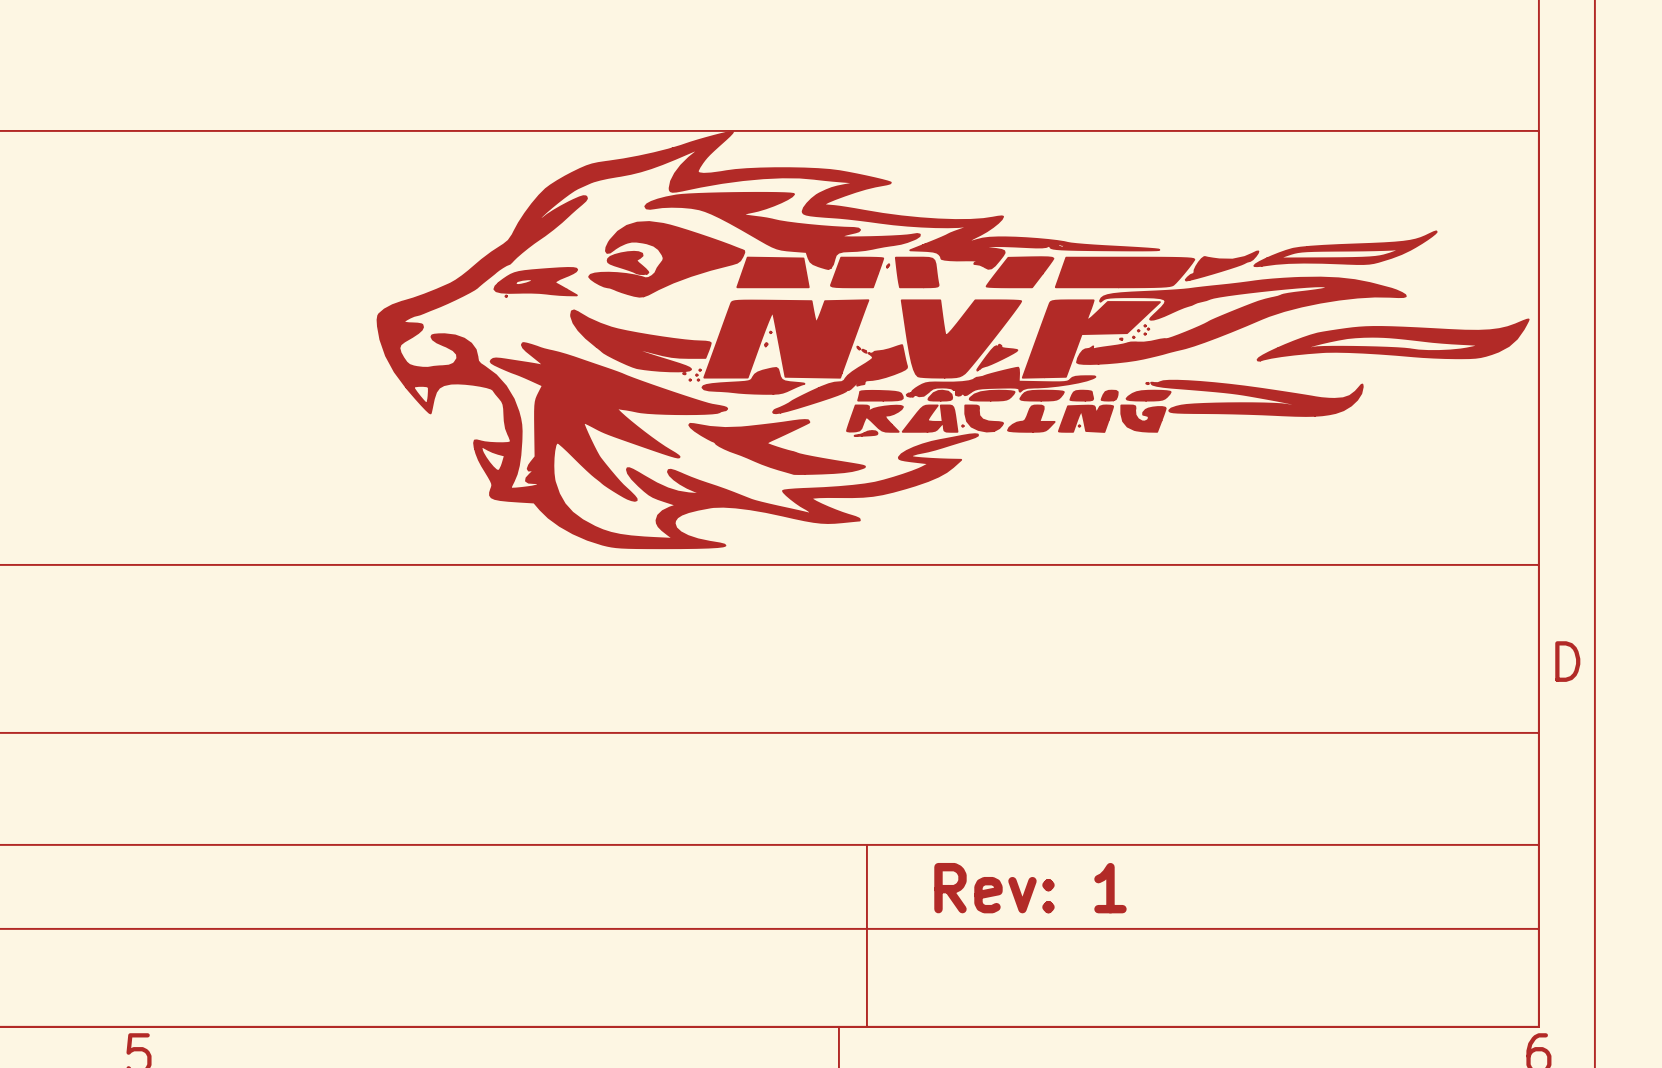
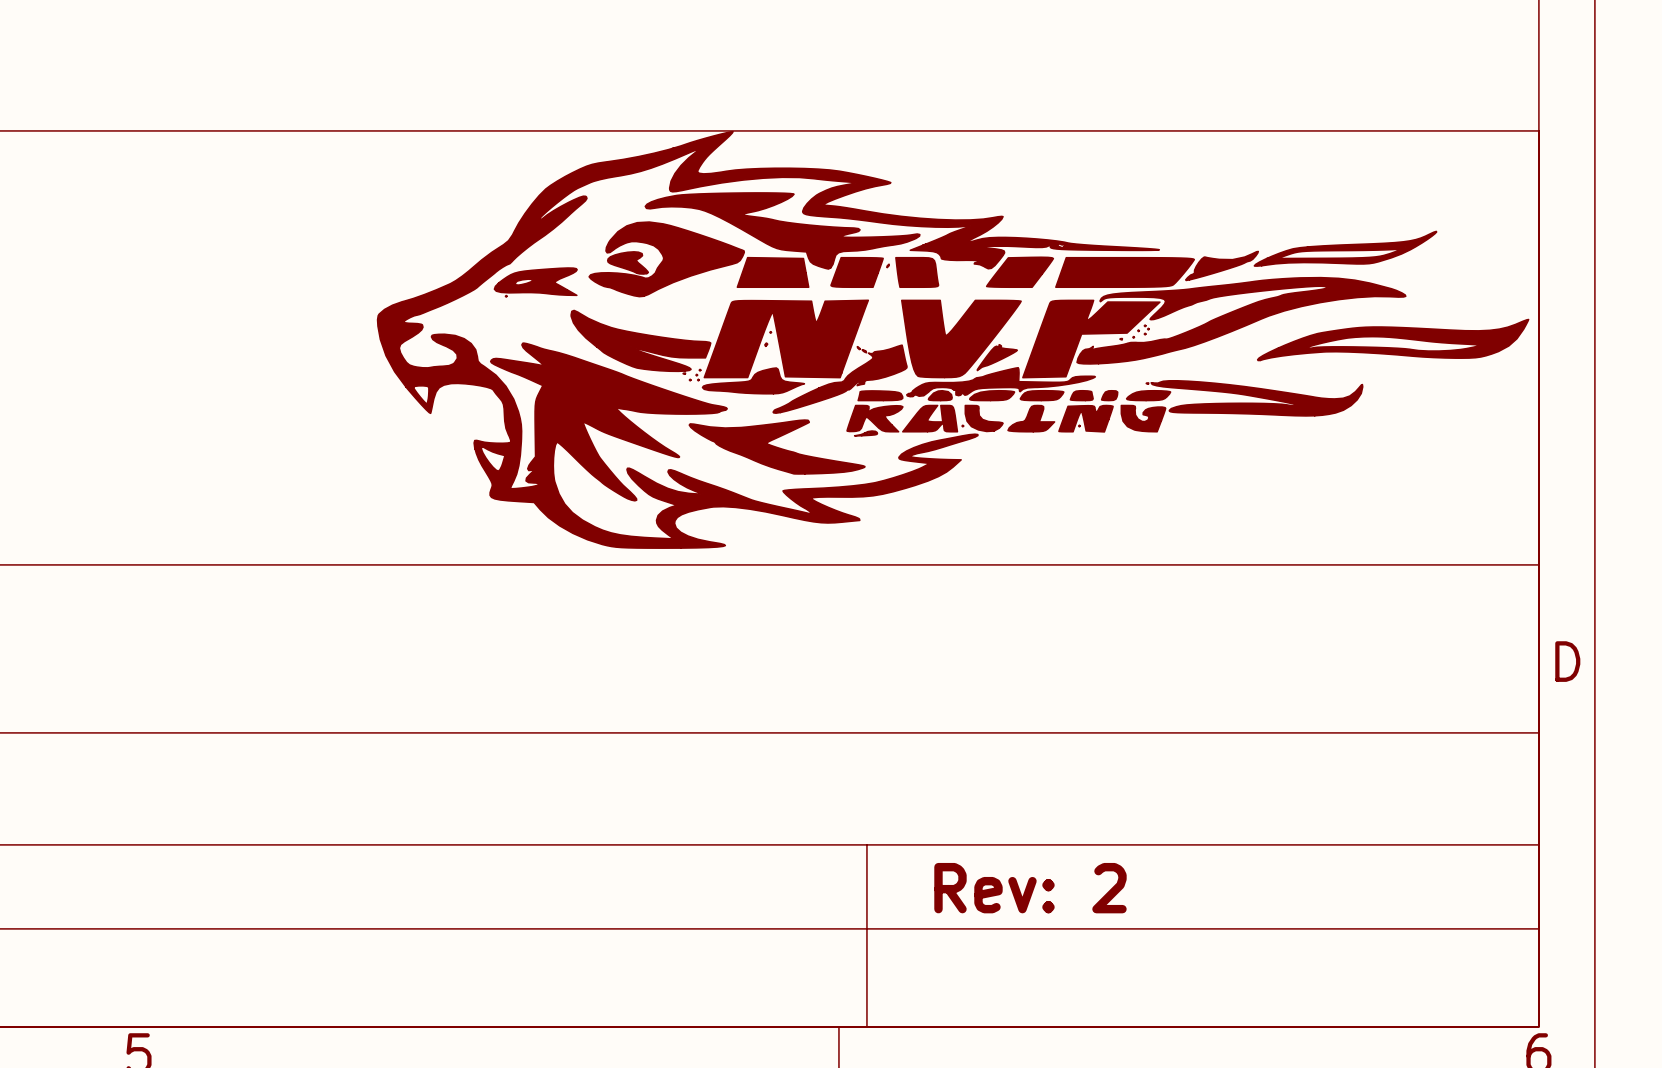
title block: Rev: 1 (1030, 888) -> Rev: 2 (1030, 888)

